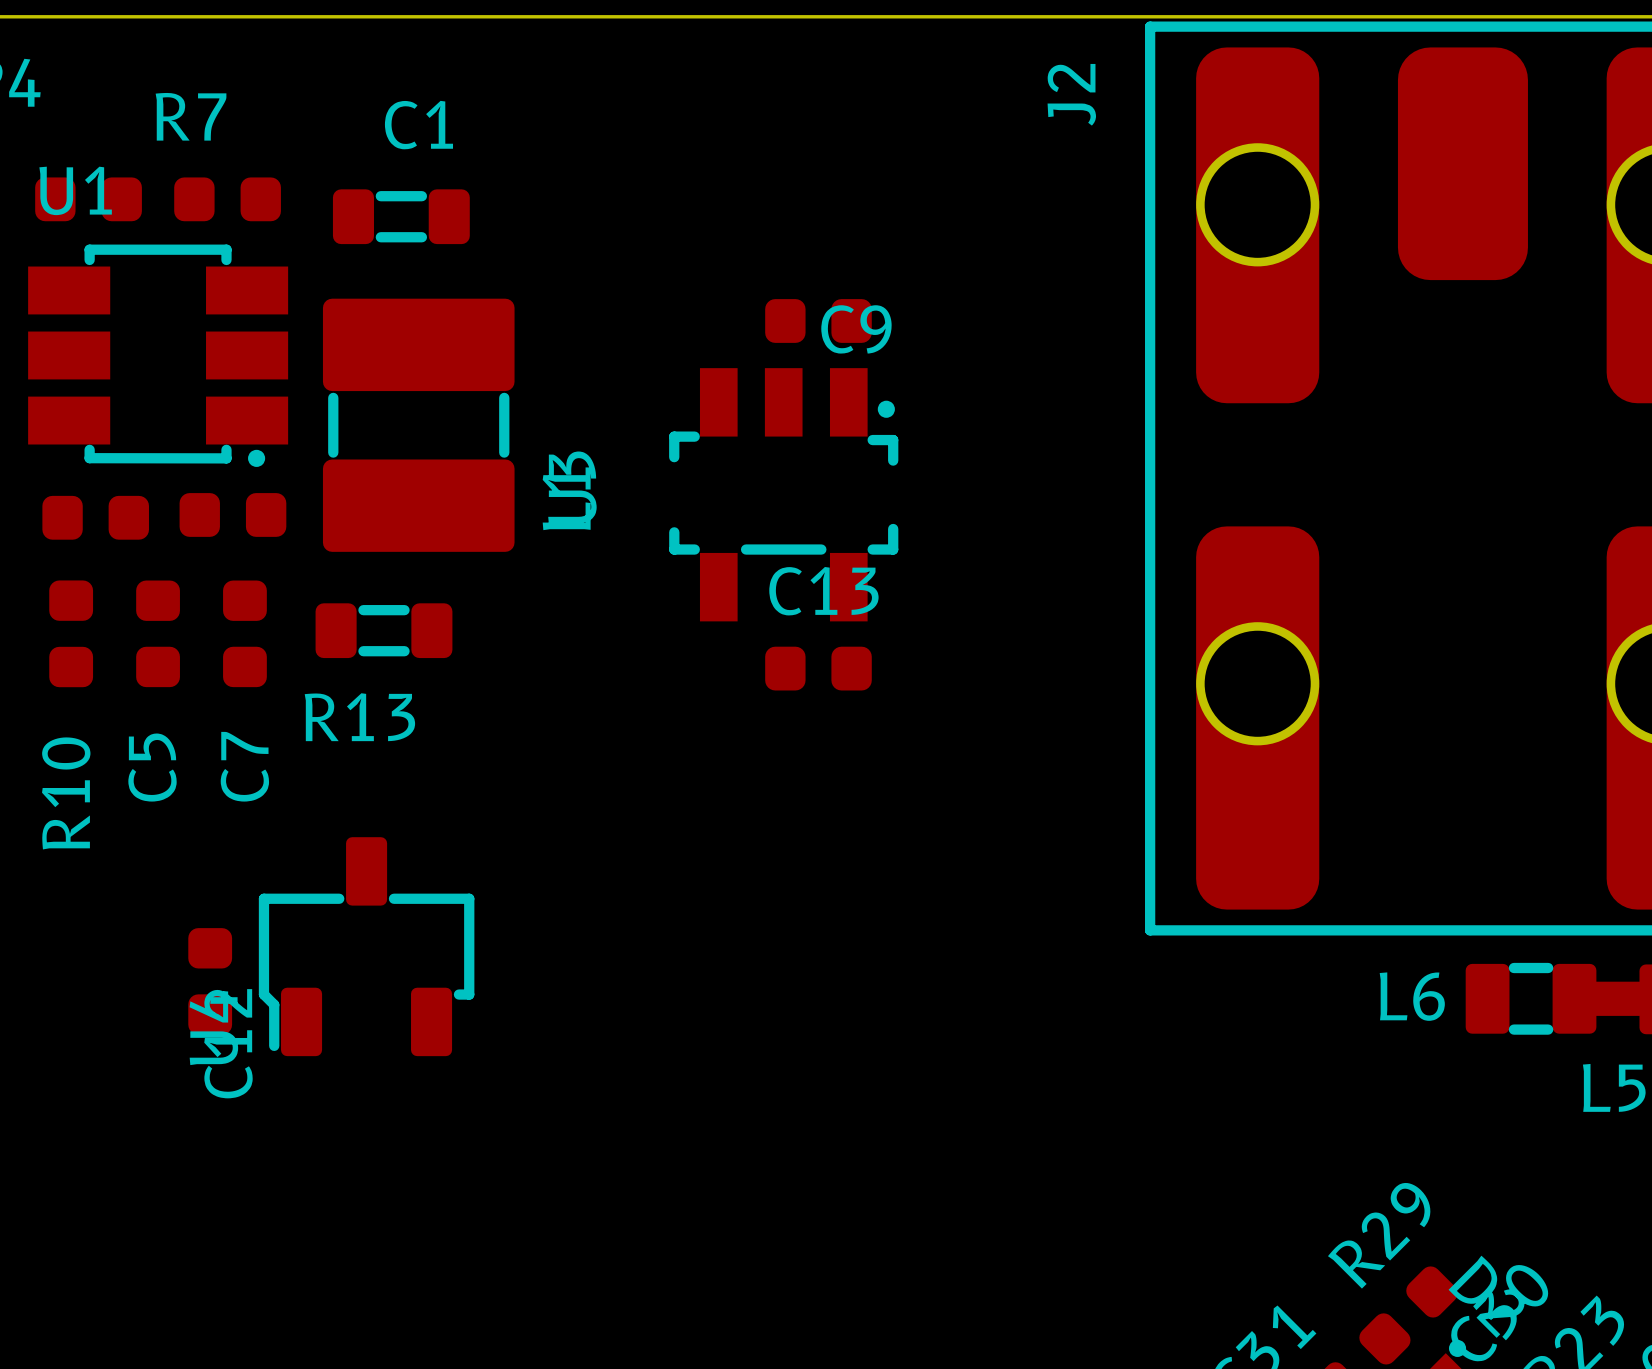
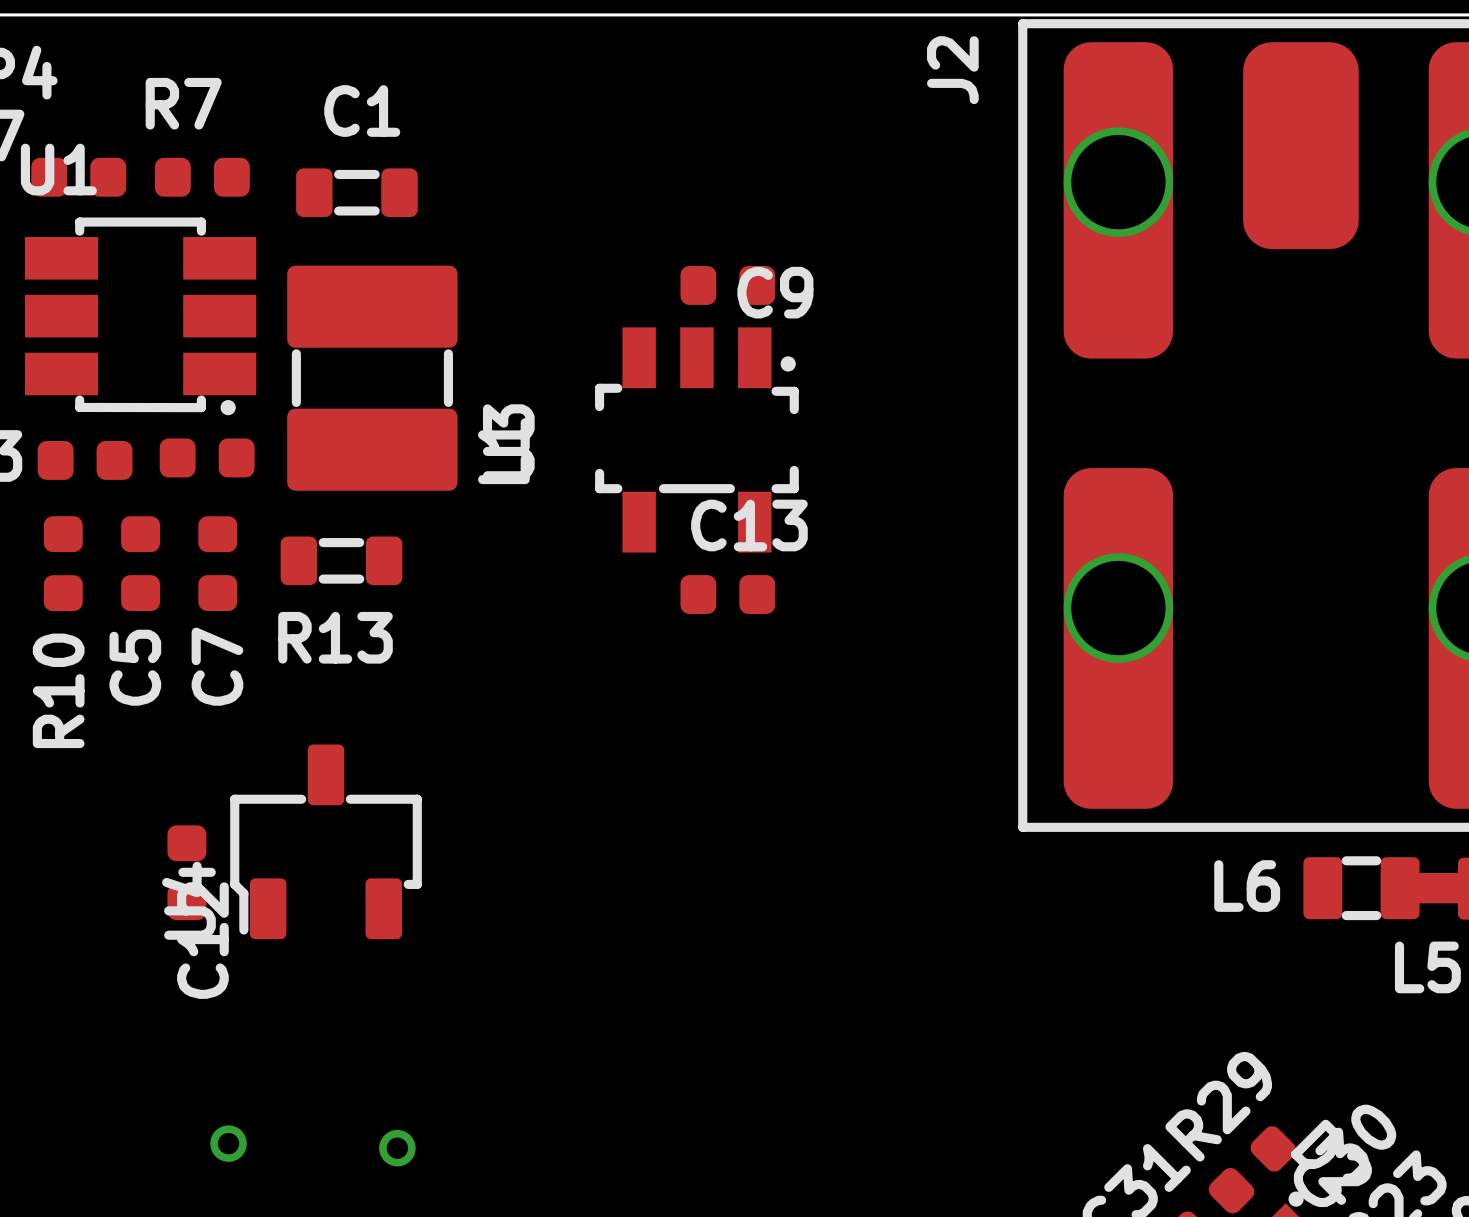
via: none -> (228, 1143)
via: none -> (397, 1148)

